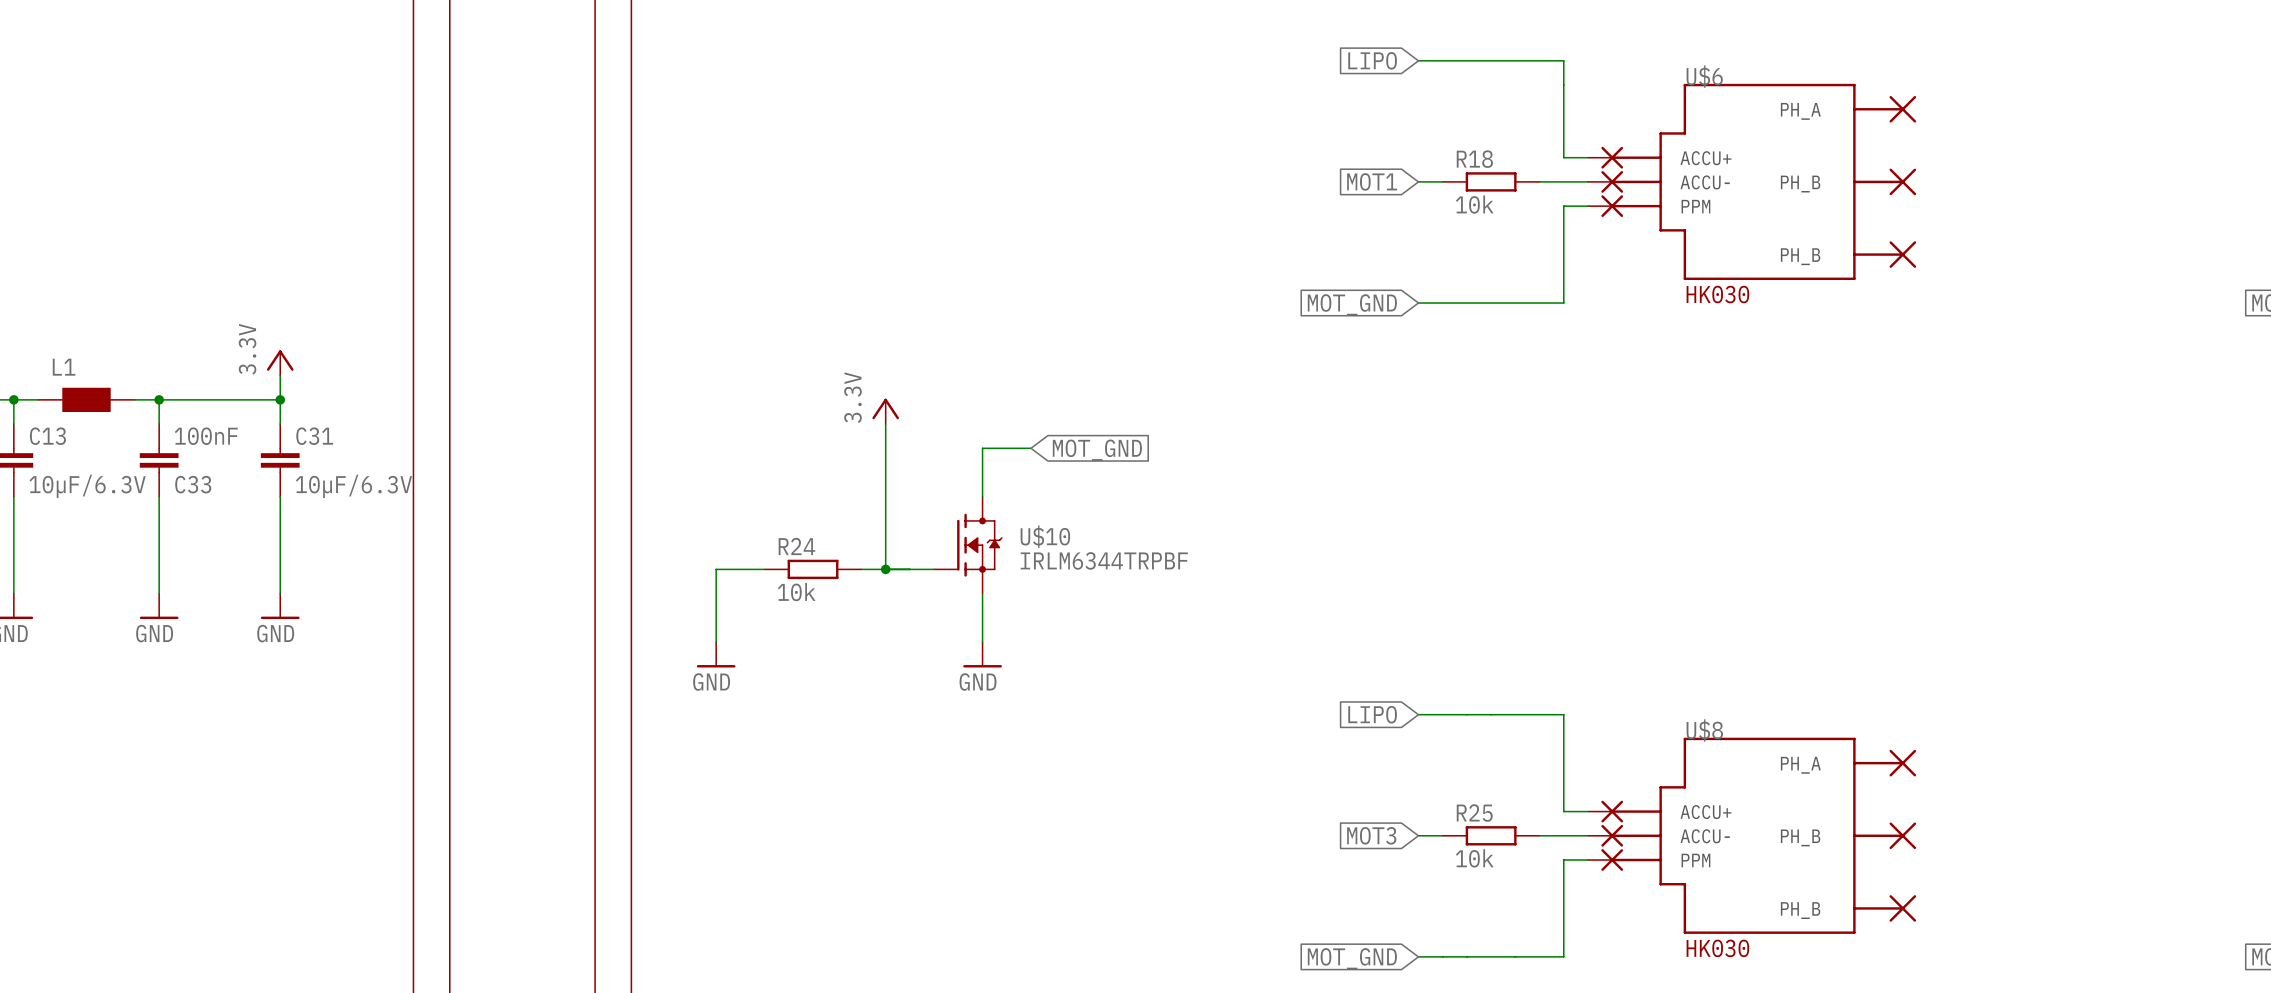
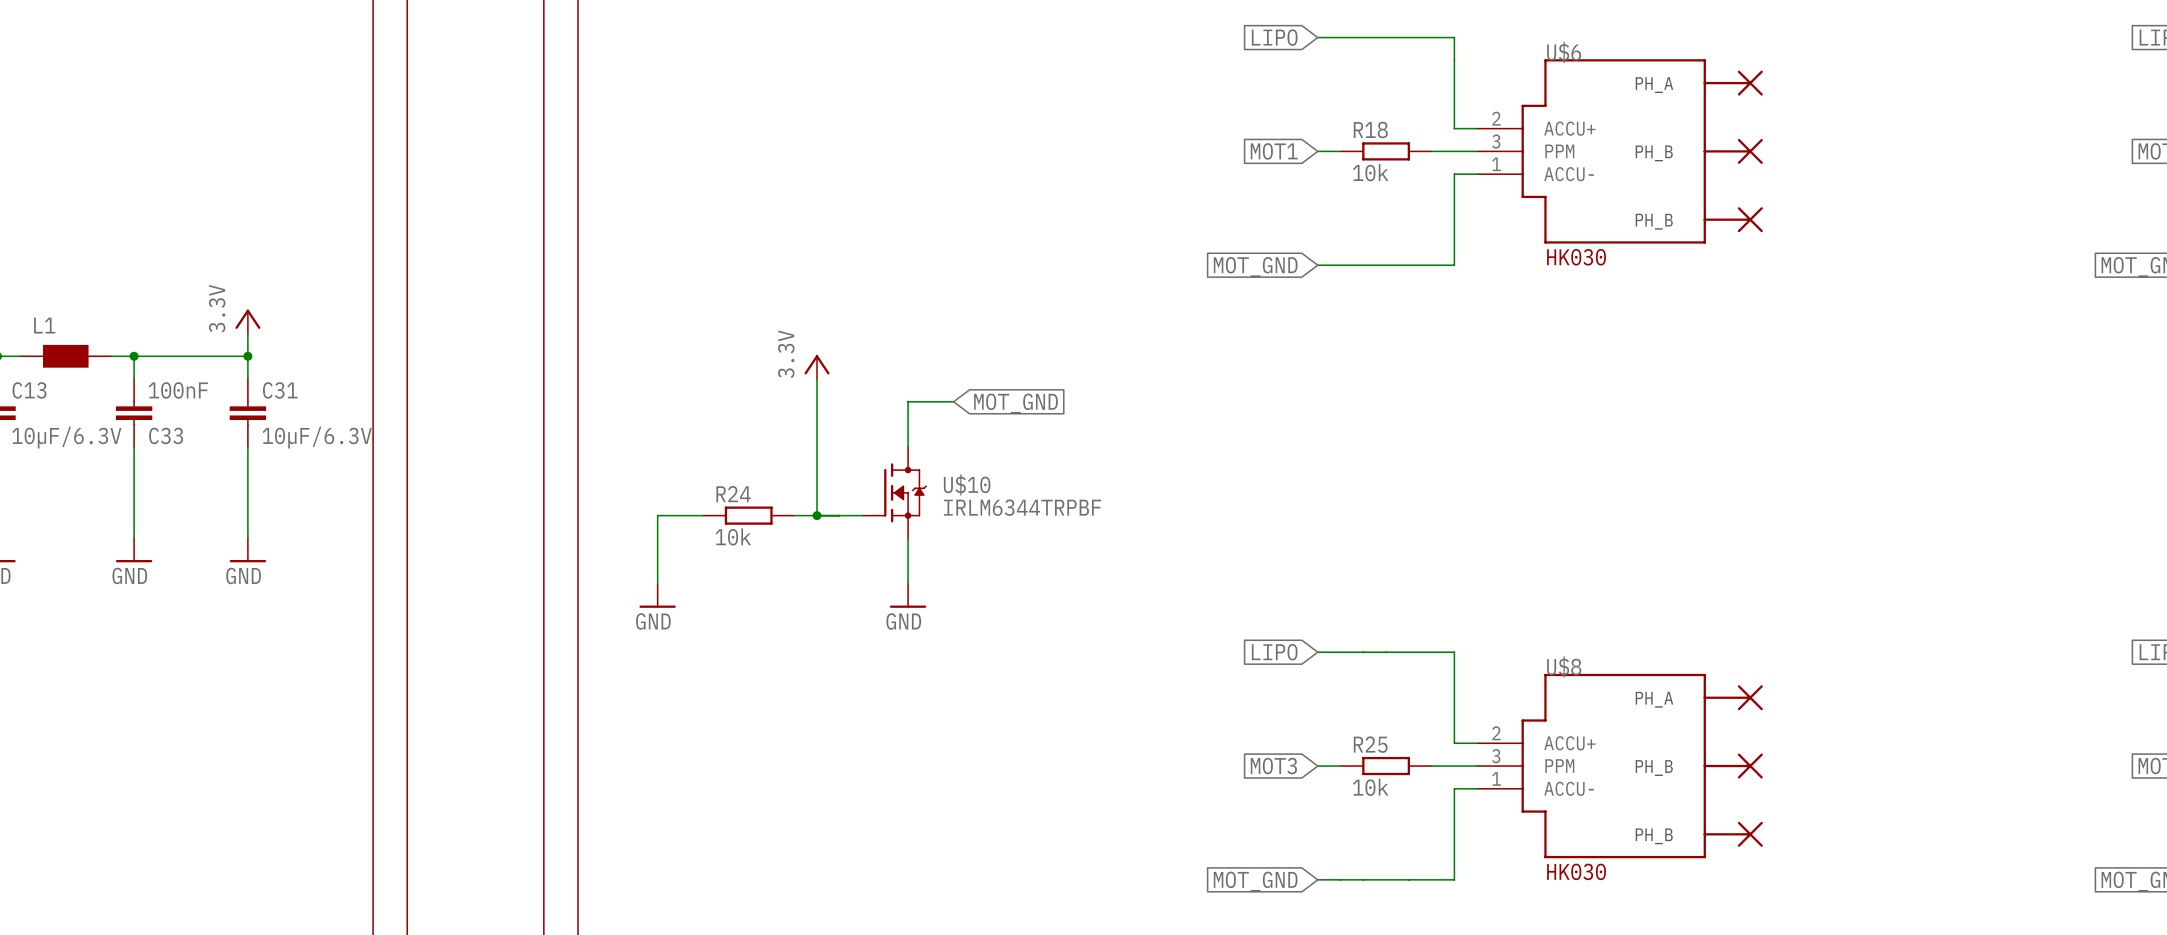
U$6 symbol: [1611, 83, 1917, 281] -> [1477, 59, 1763, 244]
part: (1605, 157) -> none
part: (1605, 181) -> none
part: (1605, 206) -> none
U$8 symbol: [1611, 737, 1917, 934] -> [1477, 673, 1763, 859]
part: (1605, 811) -> none
part: (1605, 835) -> none
part: (1605, 860) -> none

